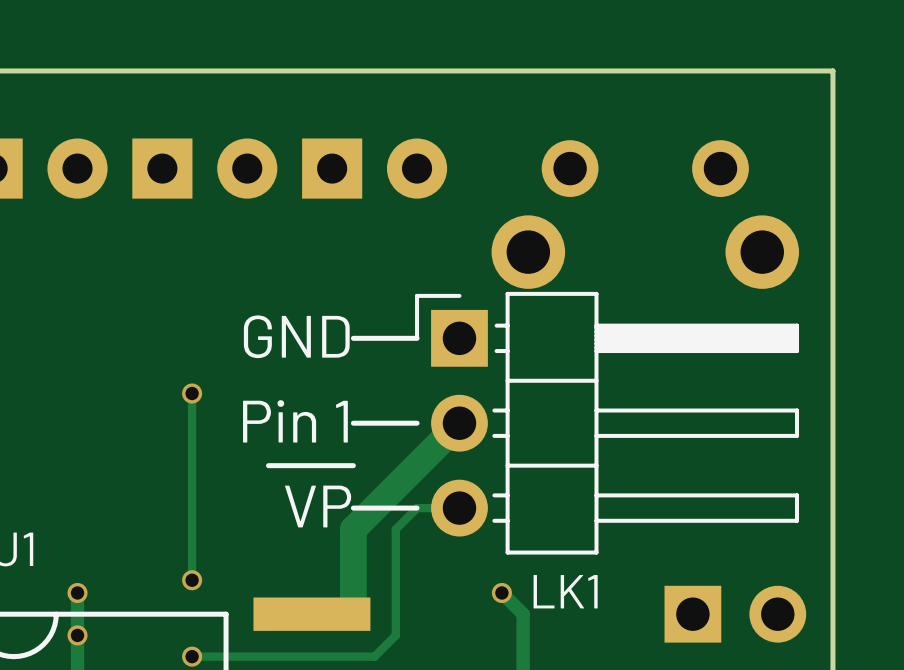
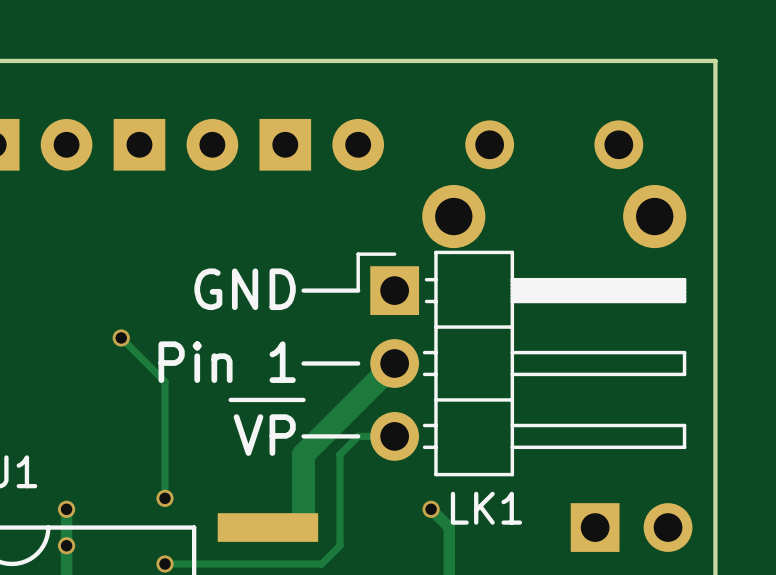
track: (192, 393) (192, 444) -> (121, 337) (165, 381)
via position: (192, 393) -> (121, 337)

